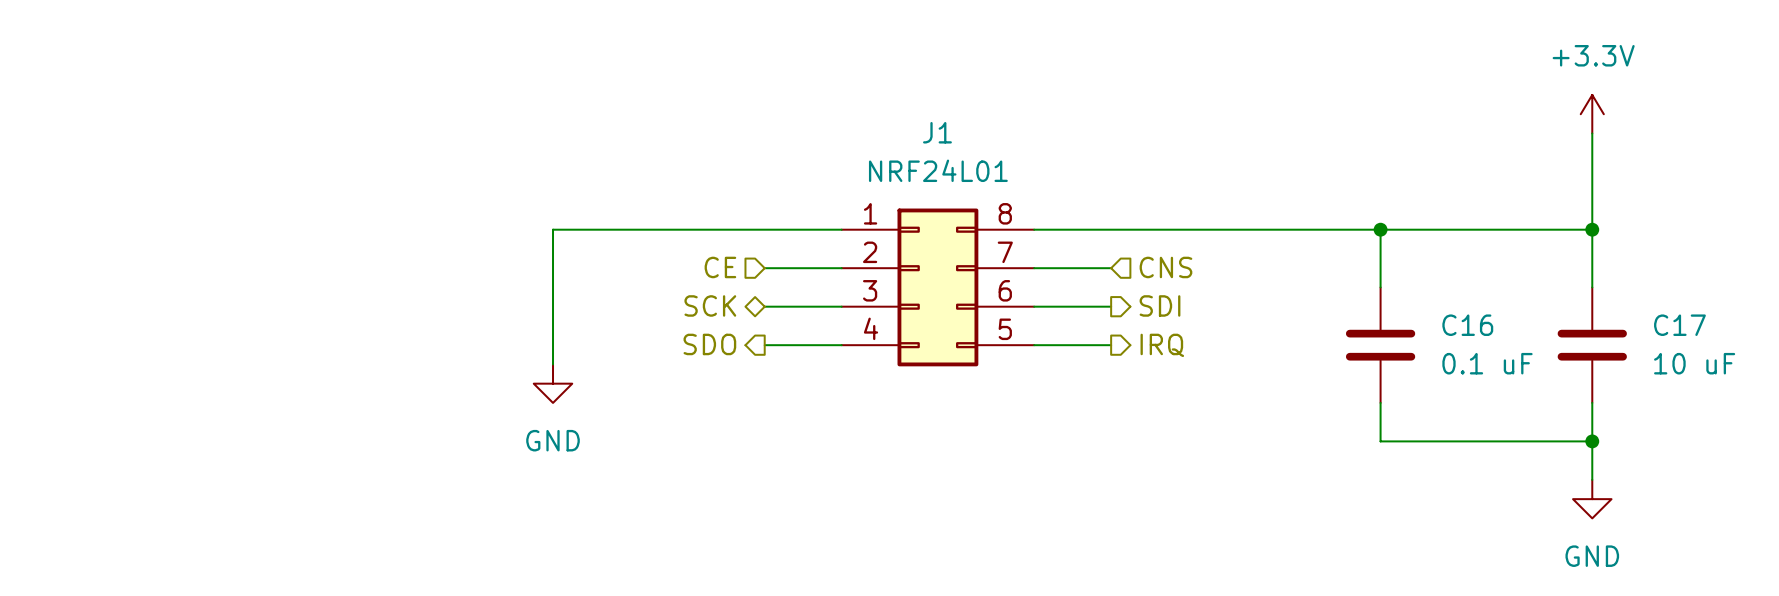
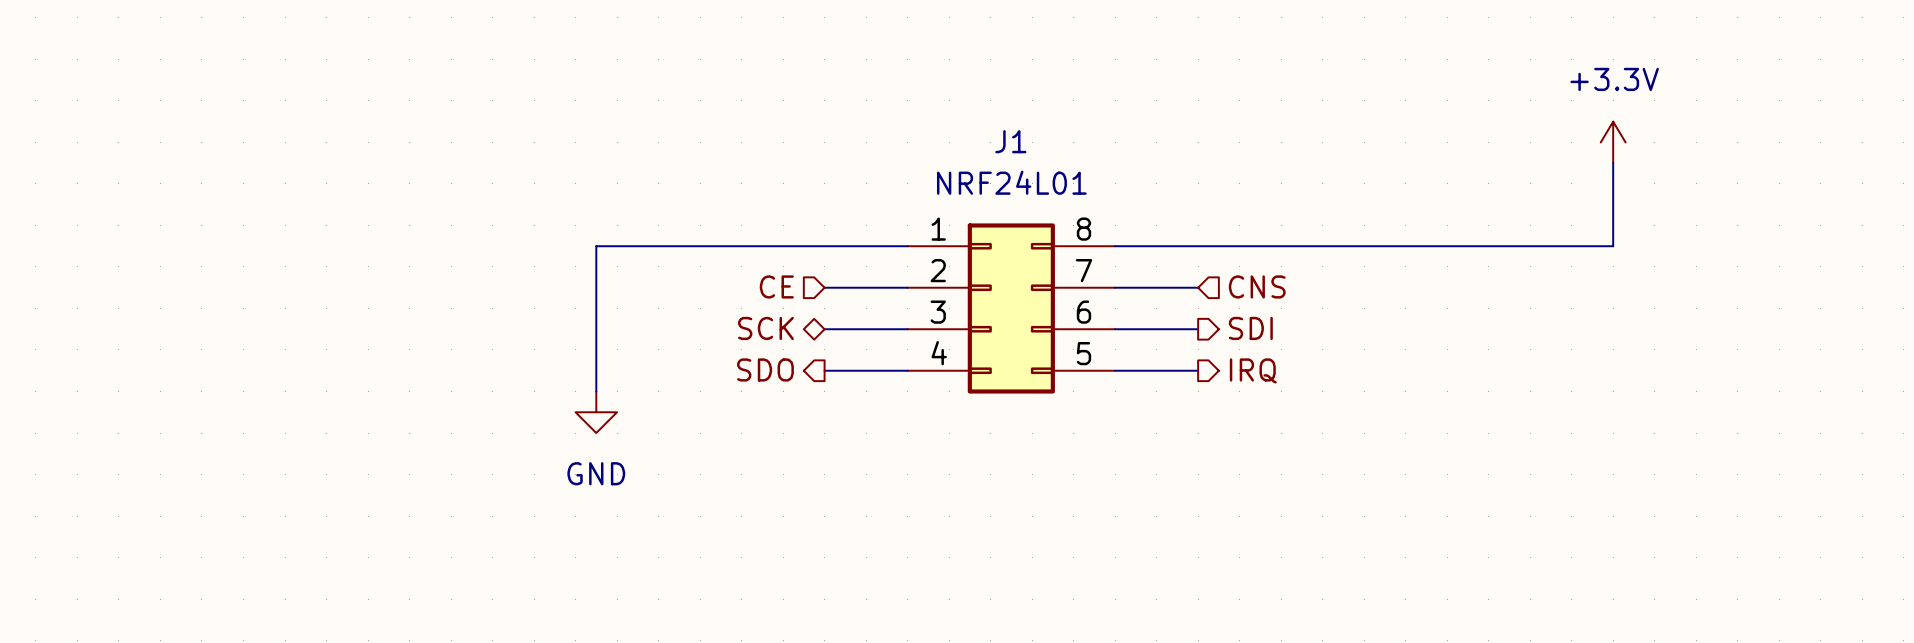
power symbol position: +3.3V (1592, 114) -> +3.3V (1613, 142)
wire: (1592, 133) (1592, 287) -> none
wire: (1380, 229) (1380, 287) -> none
junction: (1380, 229) -> none
wire: (1496, 229) (1592, 229) -> (1613, 246) (1613, 163)
junction: (1592, 229) -> none
C16: 0.1 uF (1380, 345) -> none
C17: 10 uF (1592, 345) -> none
wire: (1380, 402) (1380, 441) (1592, 441) -> none
wire: (1592, 402) (1592, 479) -> none
junction: (1592, 441) -> none
power symbol: GND (1592, 499) -> none

